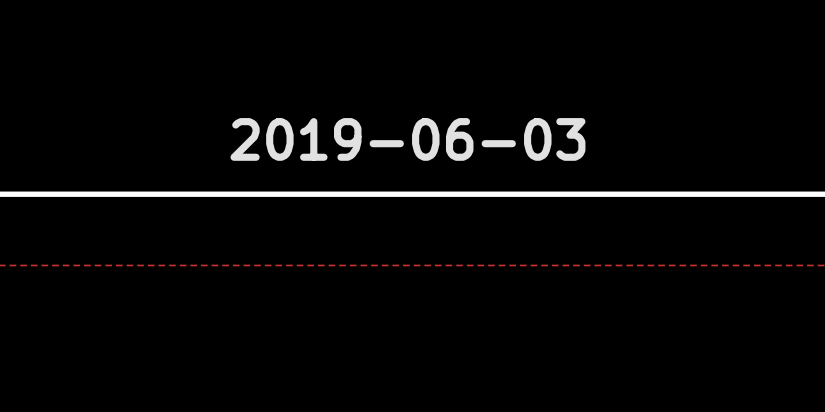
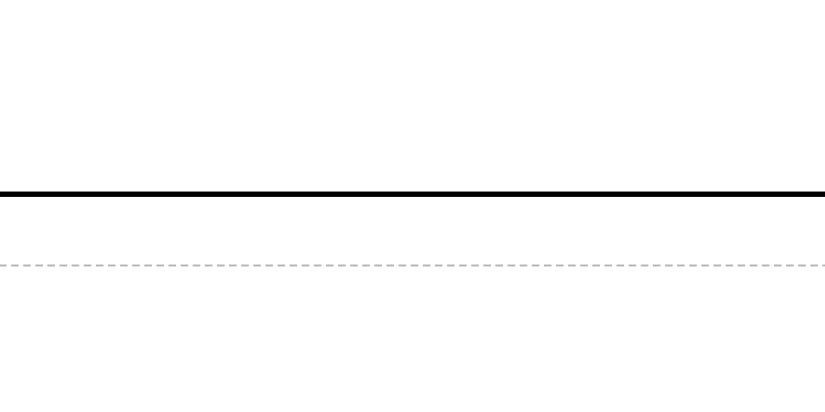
text: 2019-06-03 (407, 139) -> none

